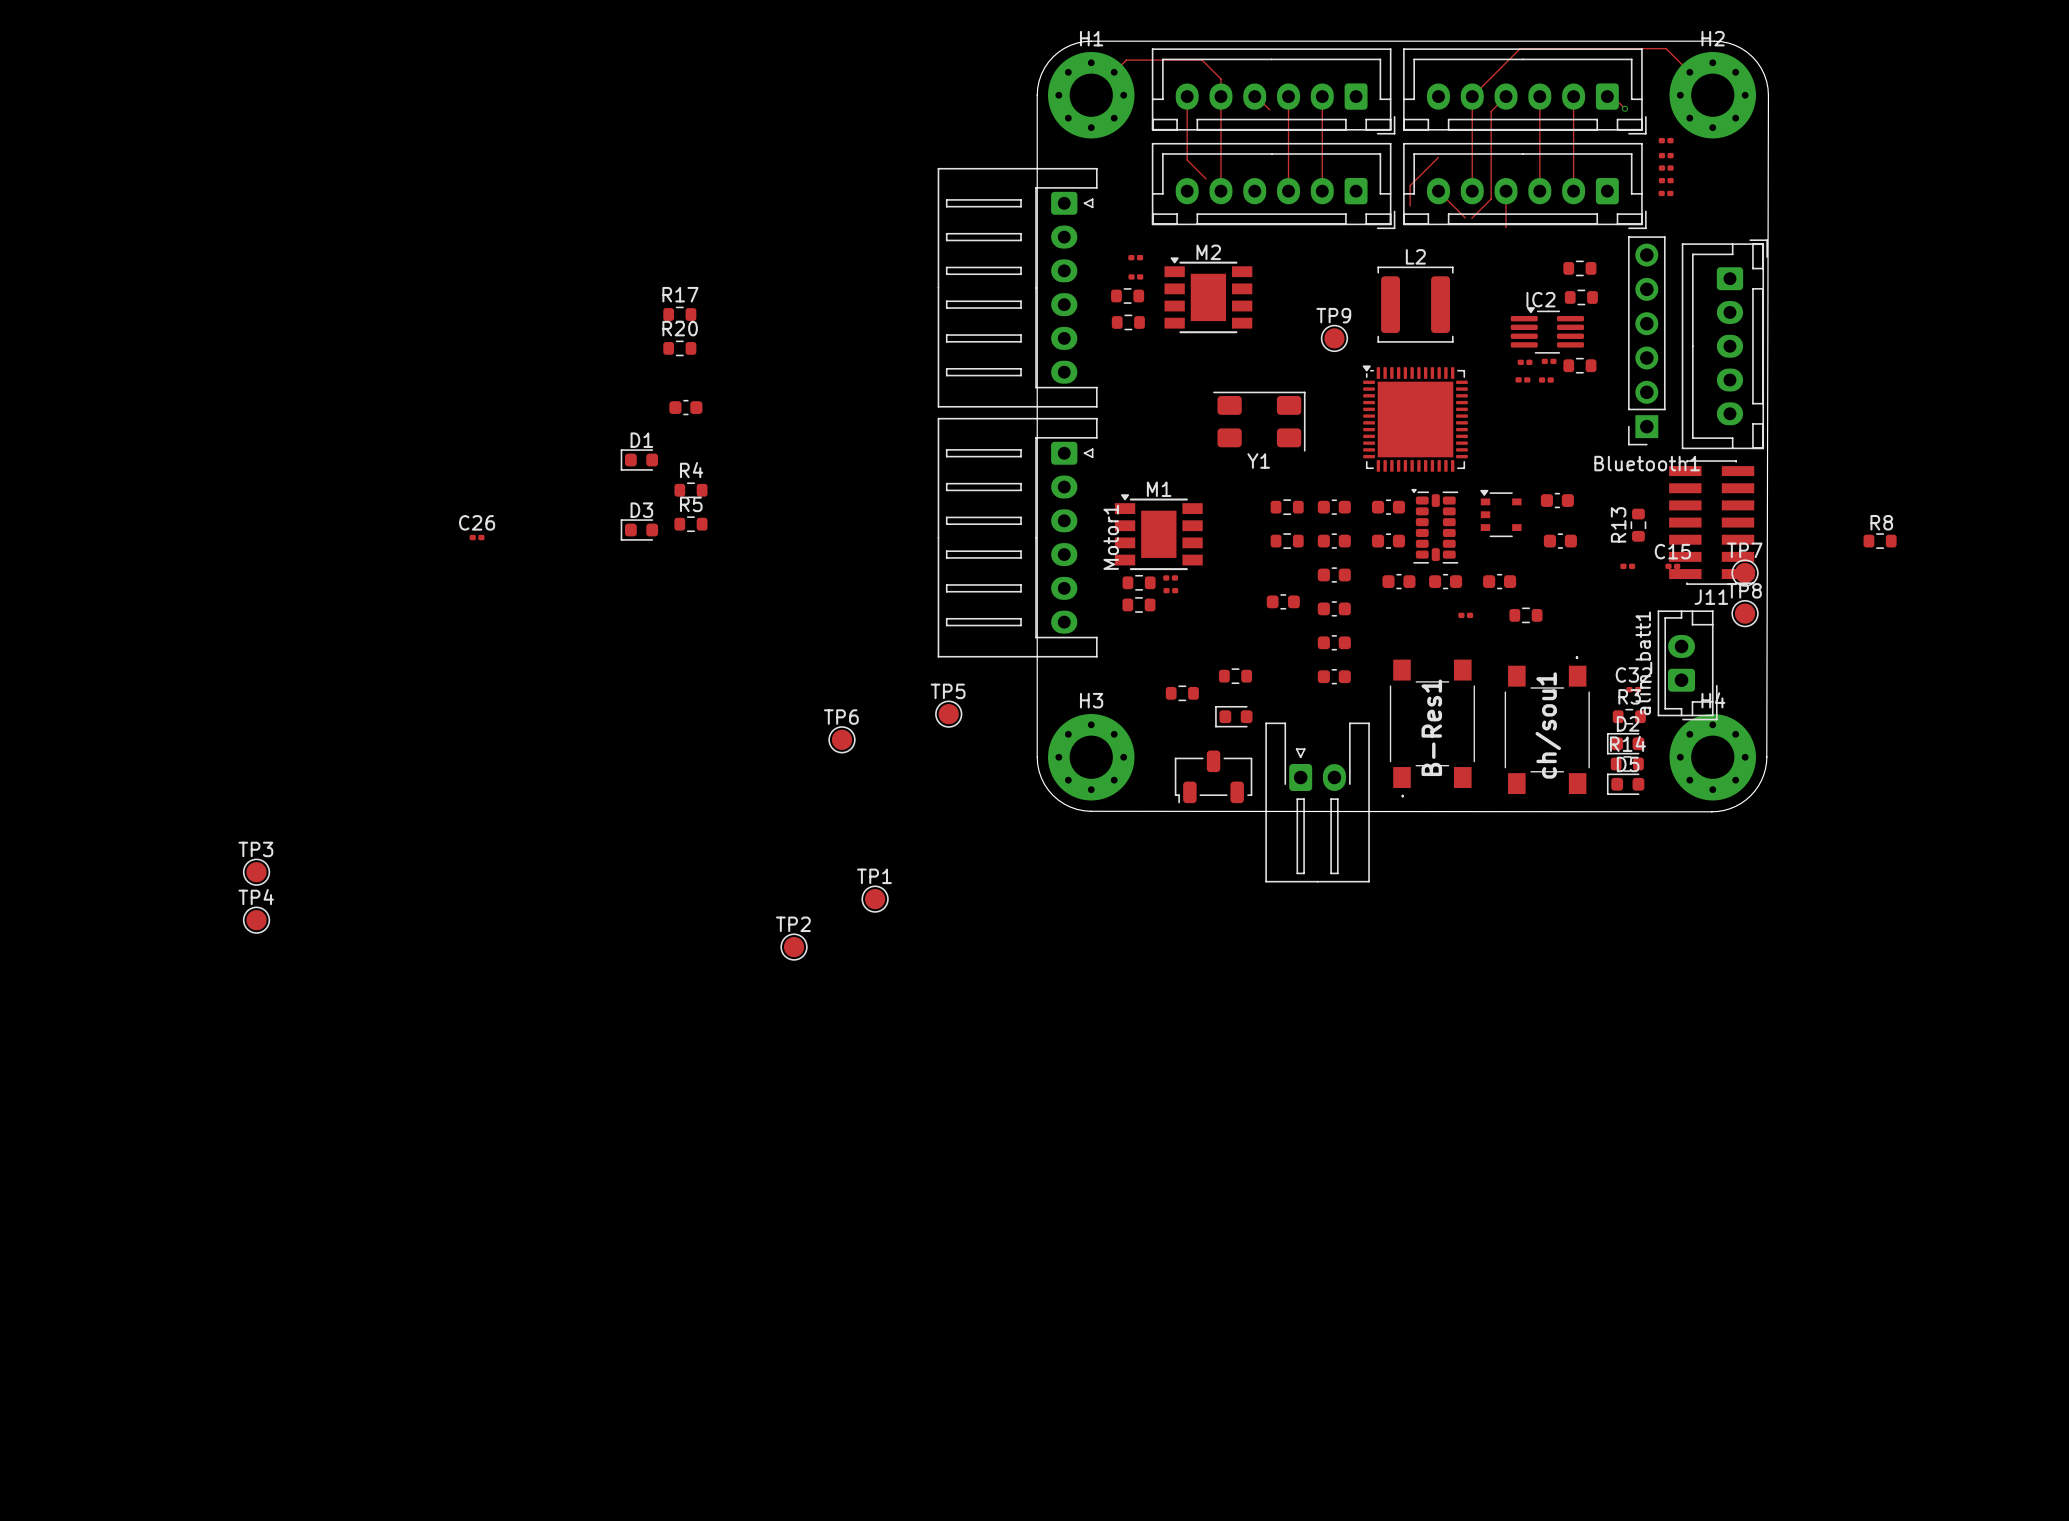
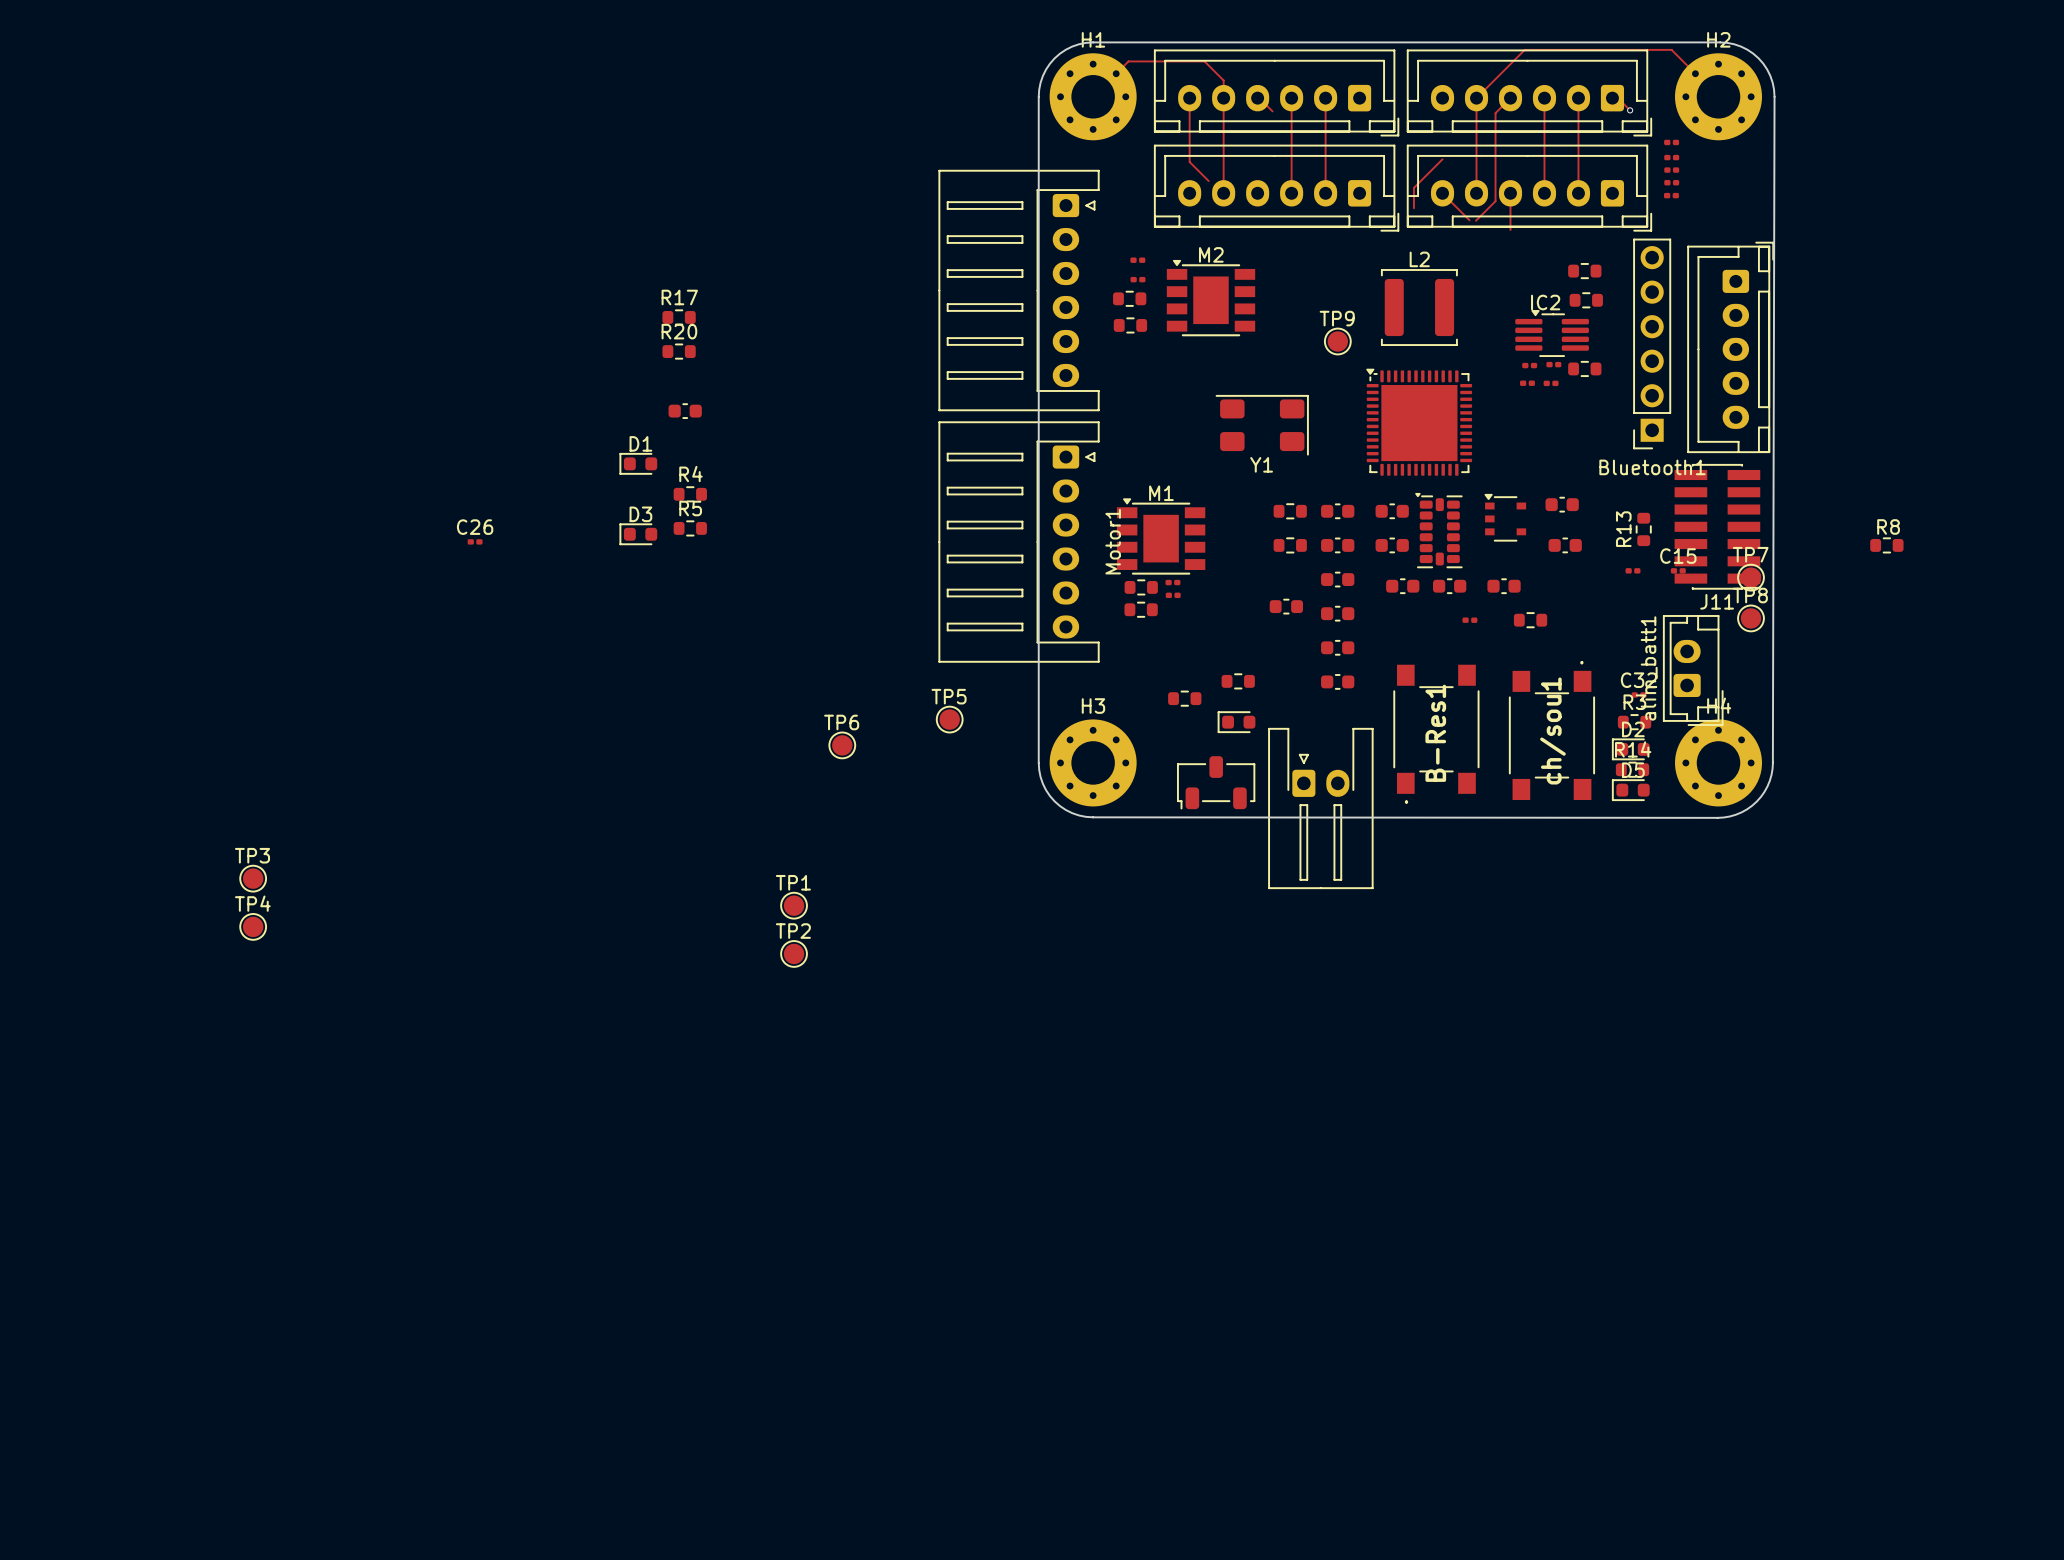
TP1 position: (875, 899) -> (794, 905)

